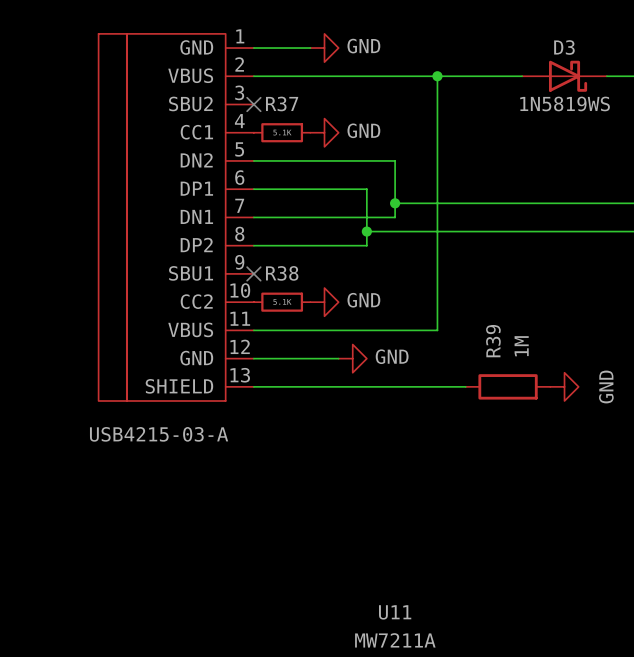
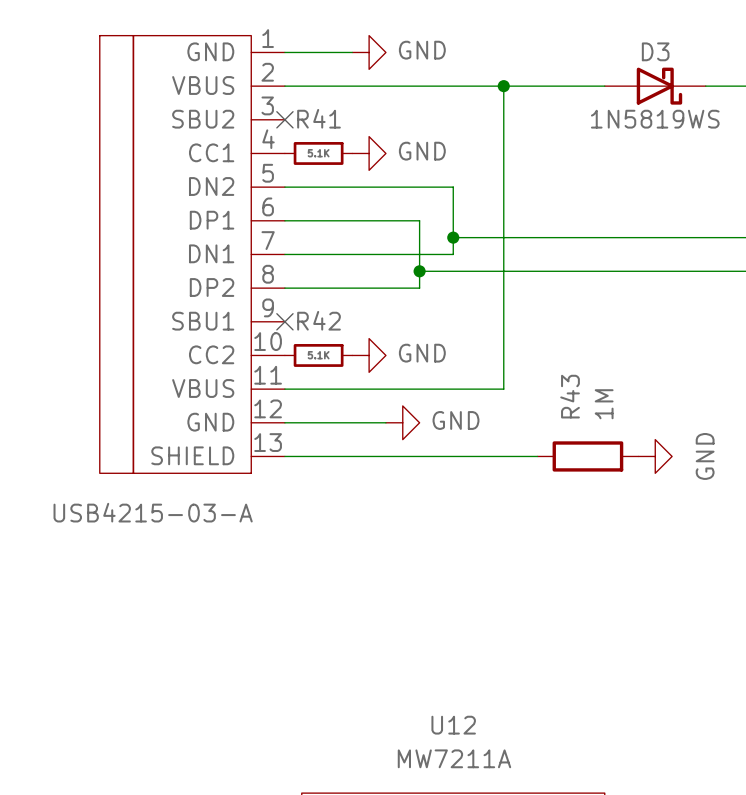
R37 name: R37 (282, 103) -> R41 (319, 118)
R38 name: R38 (282, 273) -> R42 (319, 320)
R39 name: R39 (493, 341) -> R43 (570, 396)
U11 name: U11 (395, 612) -> U12 (453, 725)

